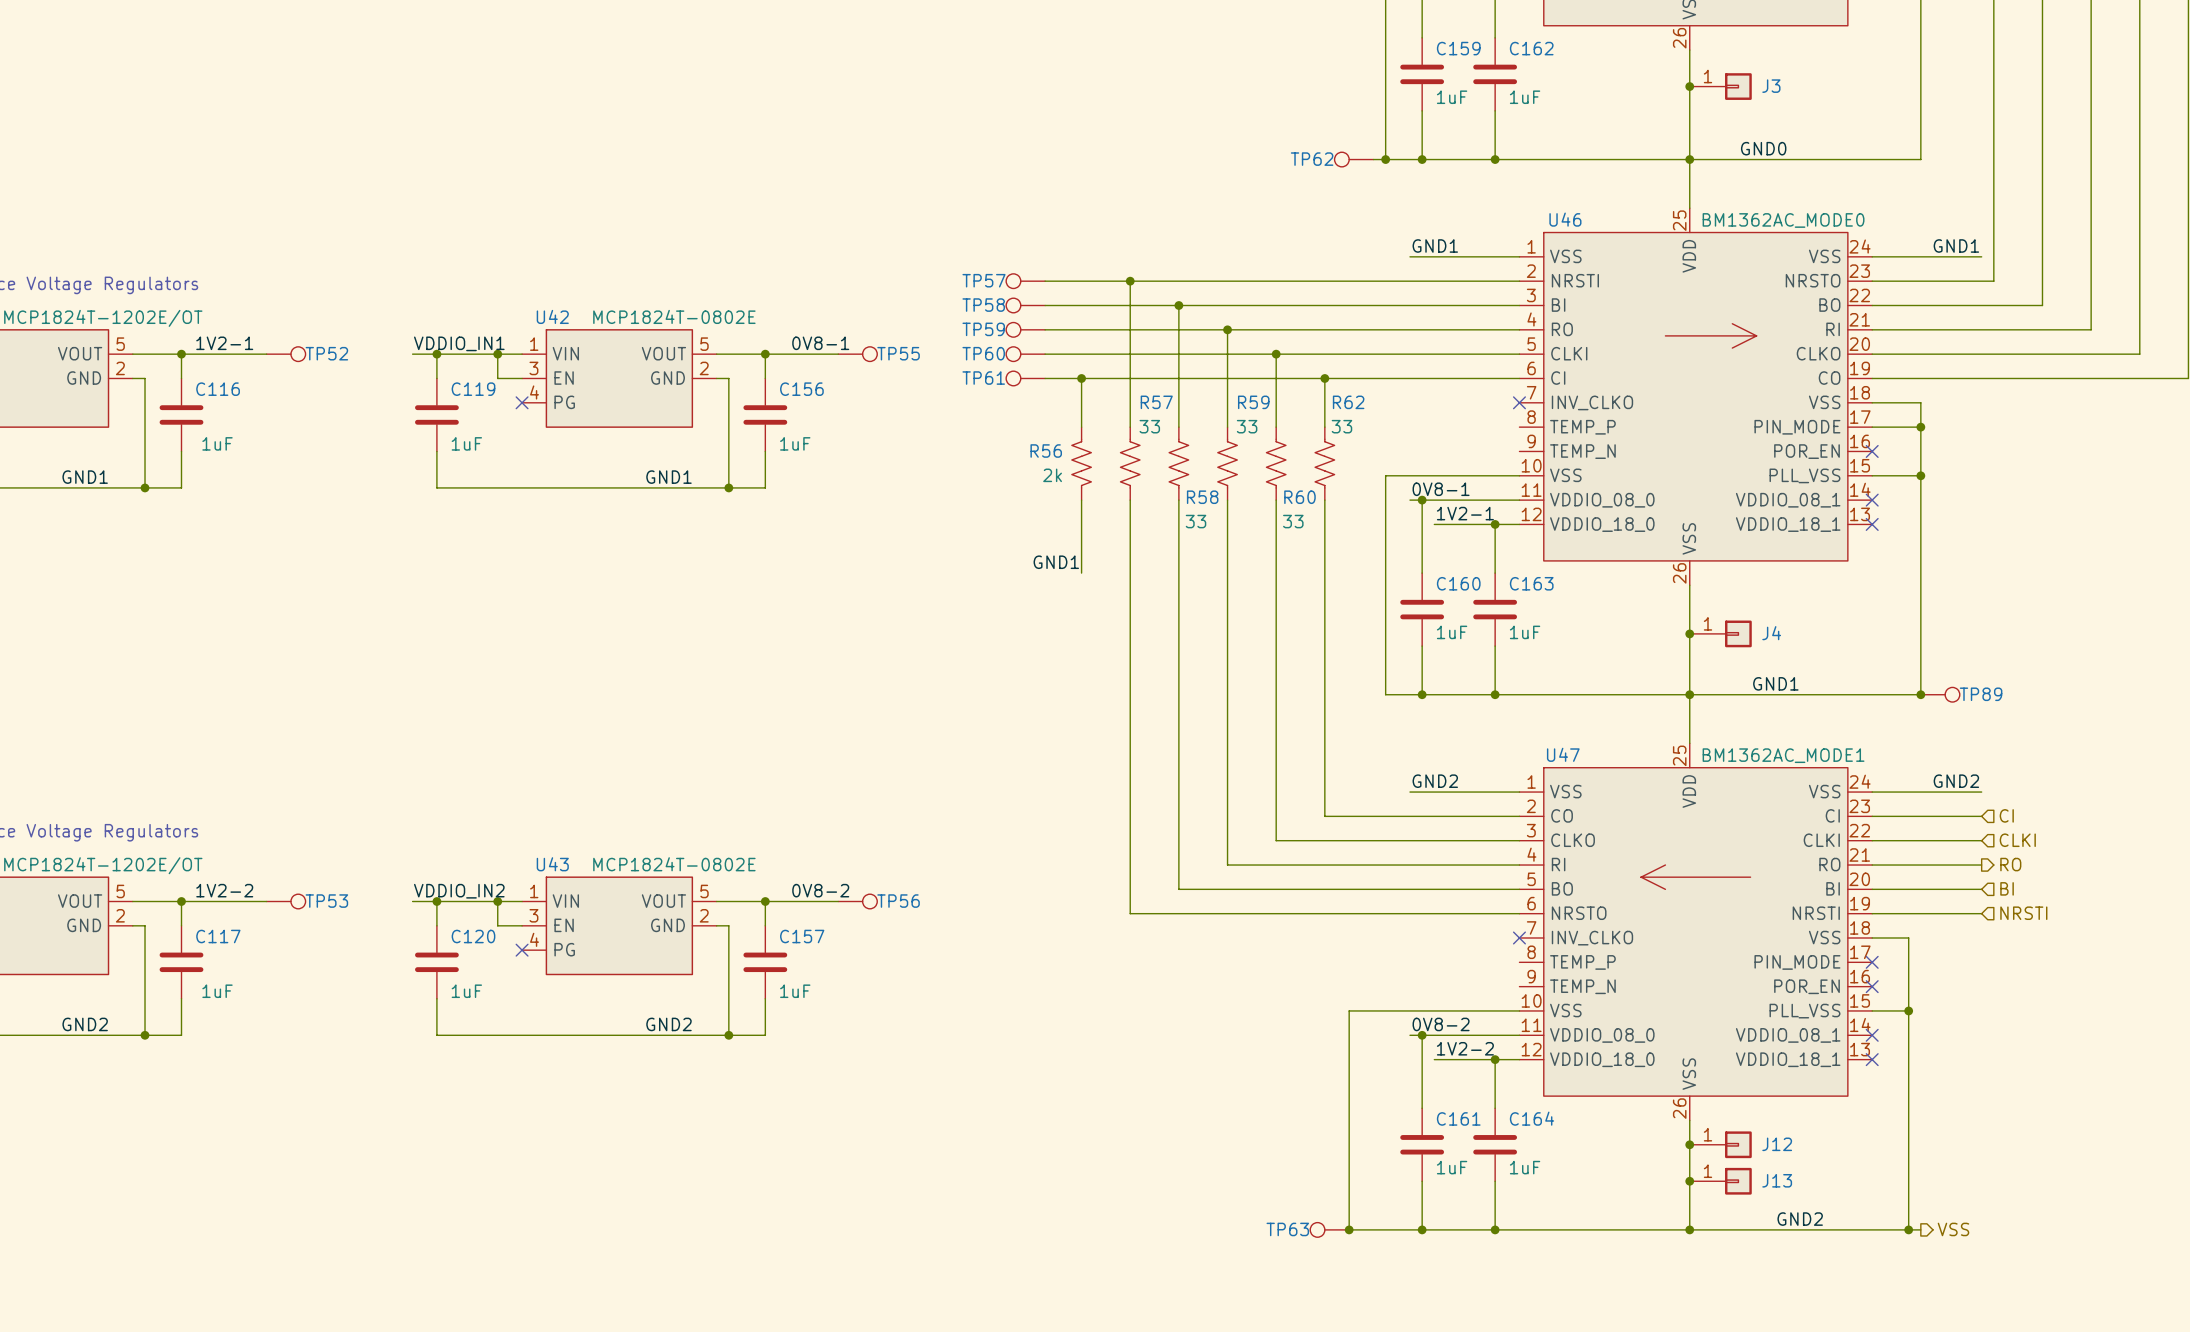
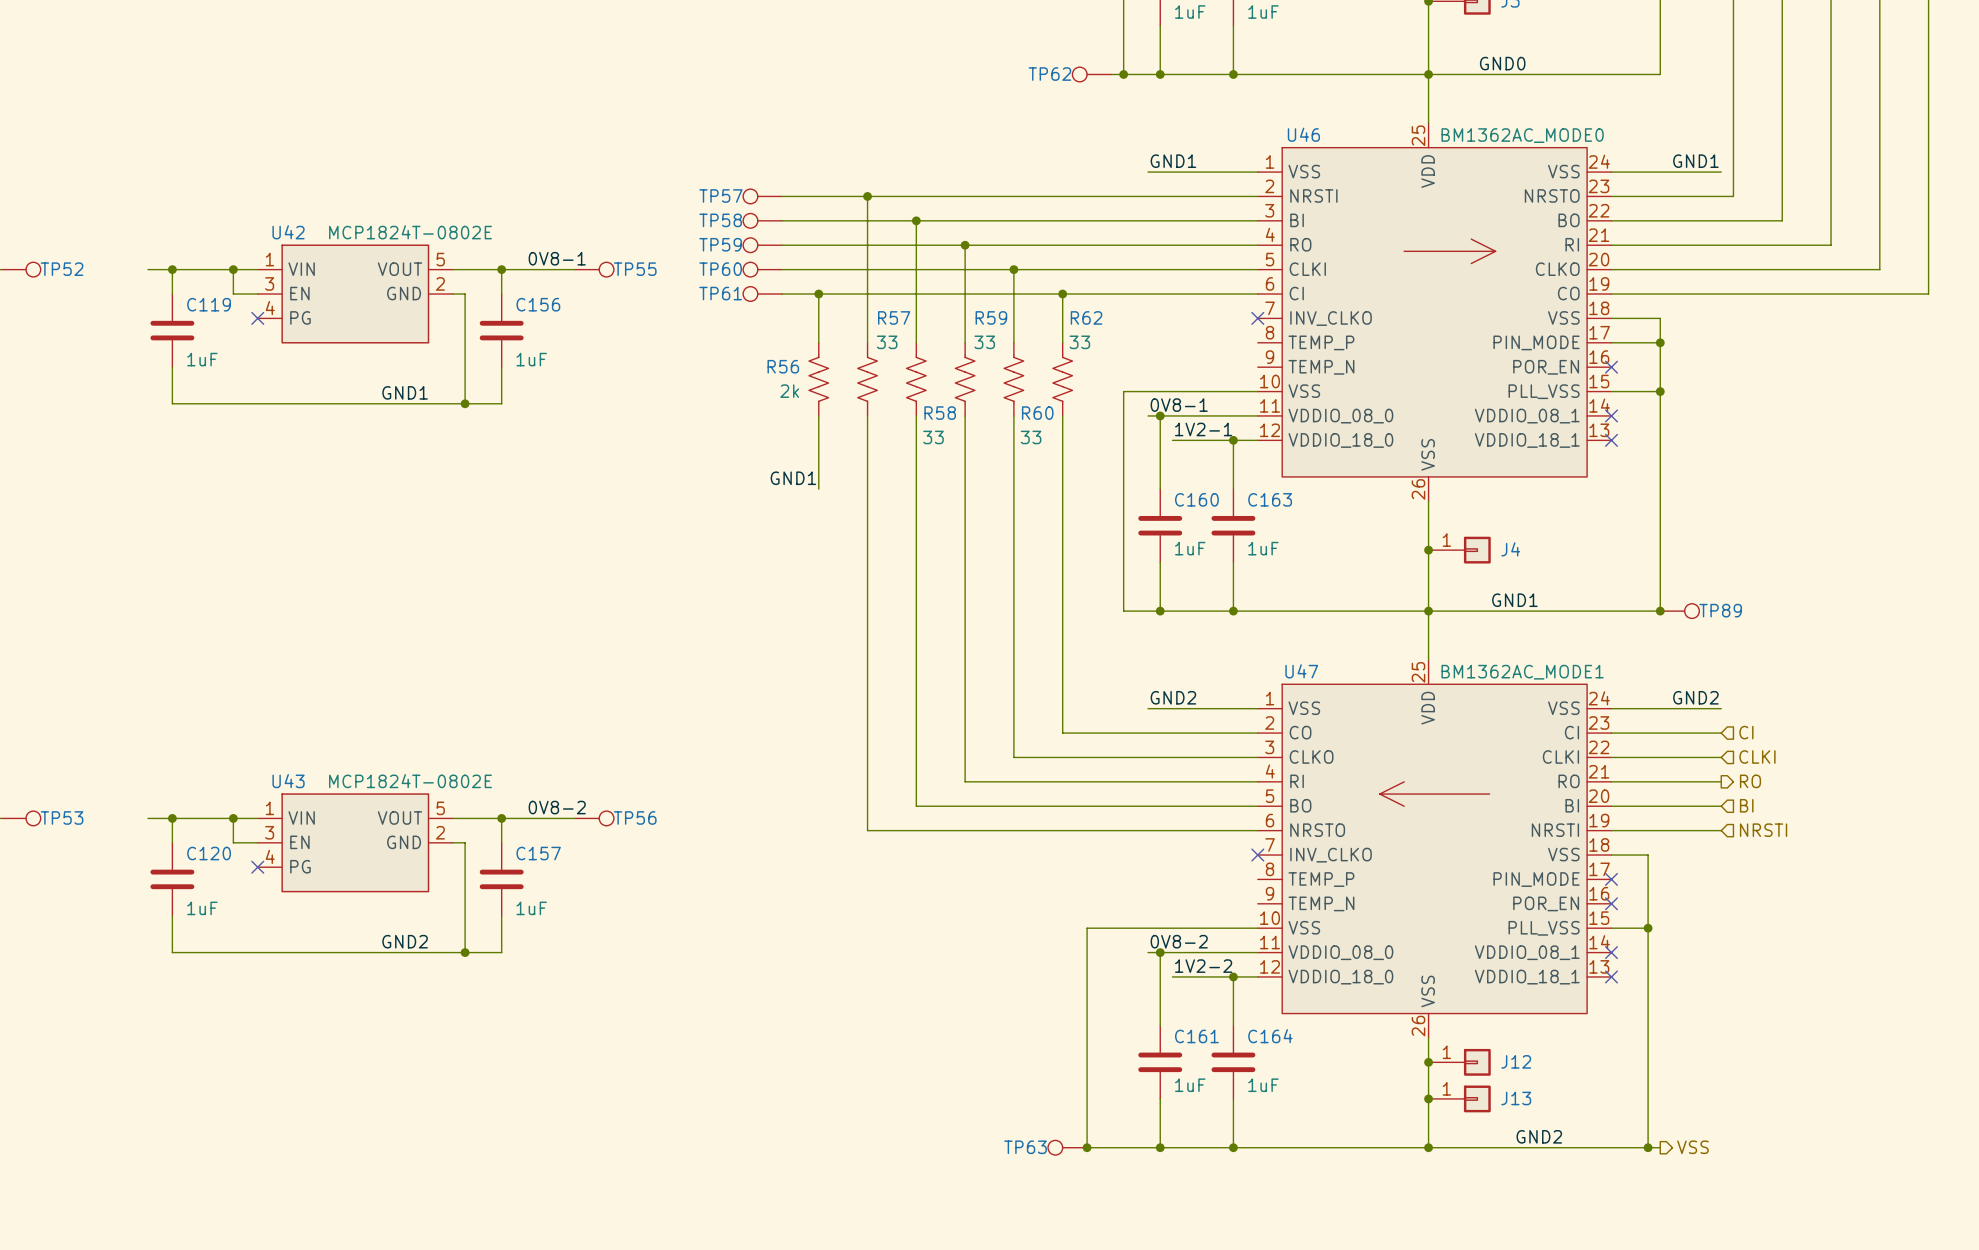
label: VDDIO_IN1 (459, 343) -> none
label: VDDIO_IN2 (459, 891) -> none

